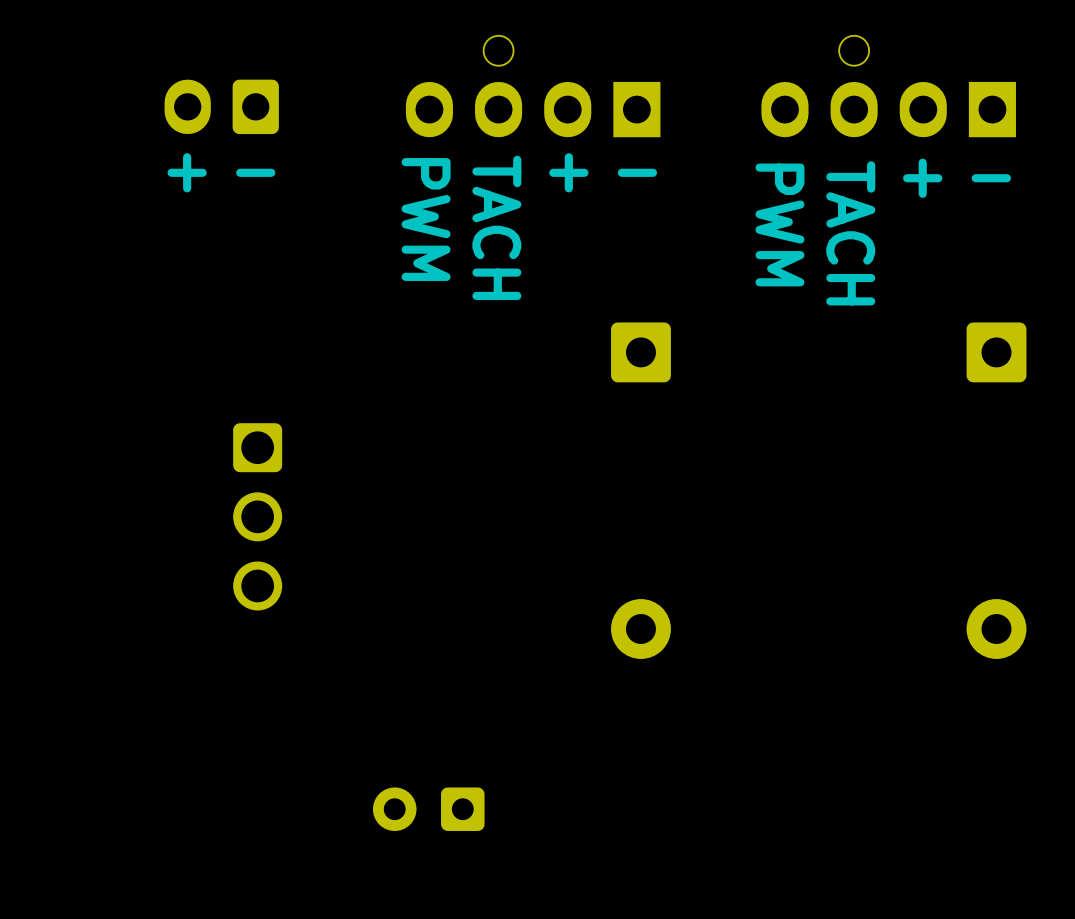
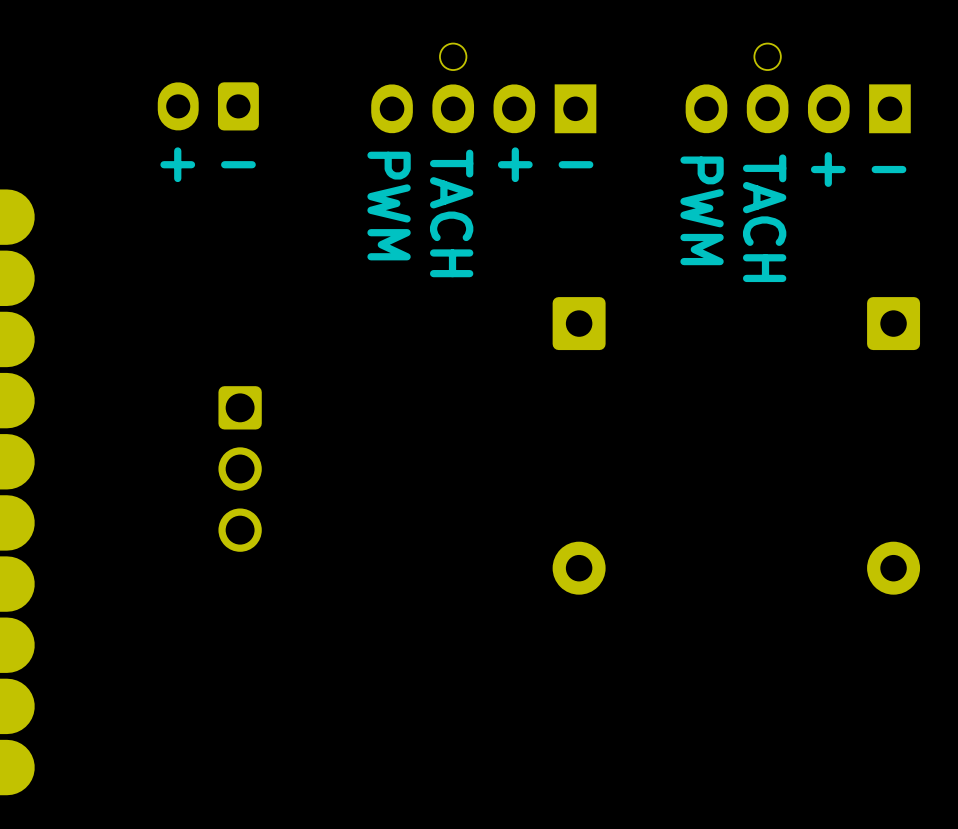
part: (428, 809) -> none

